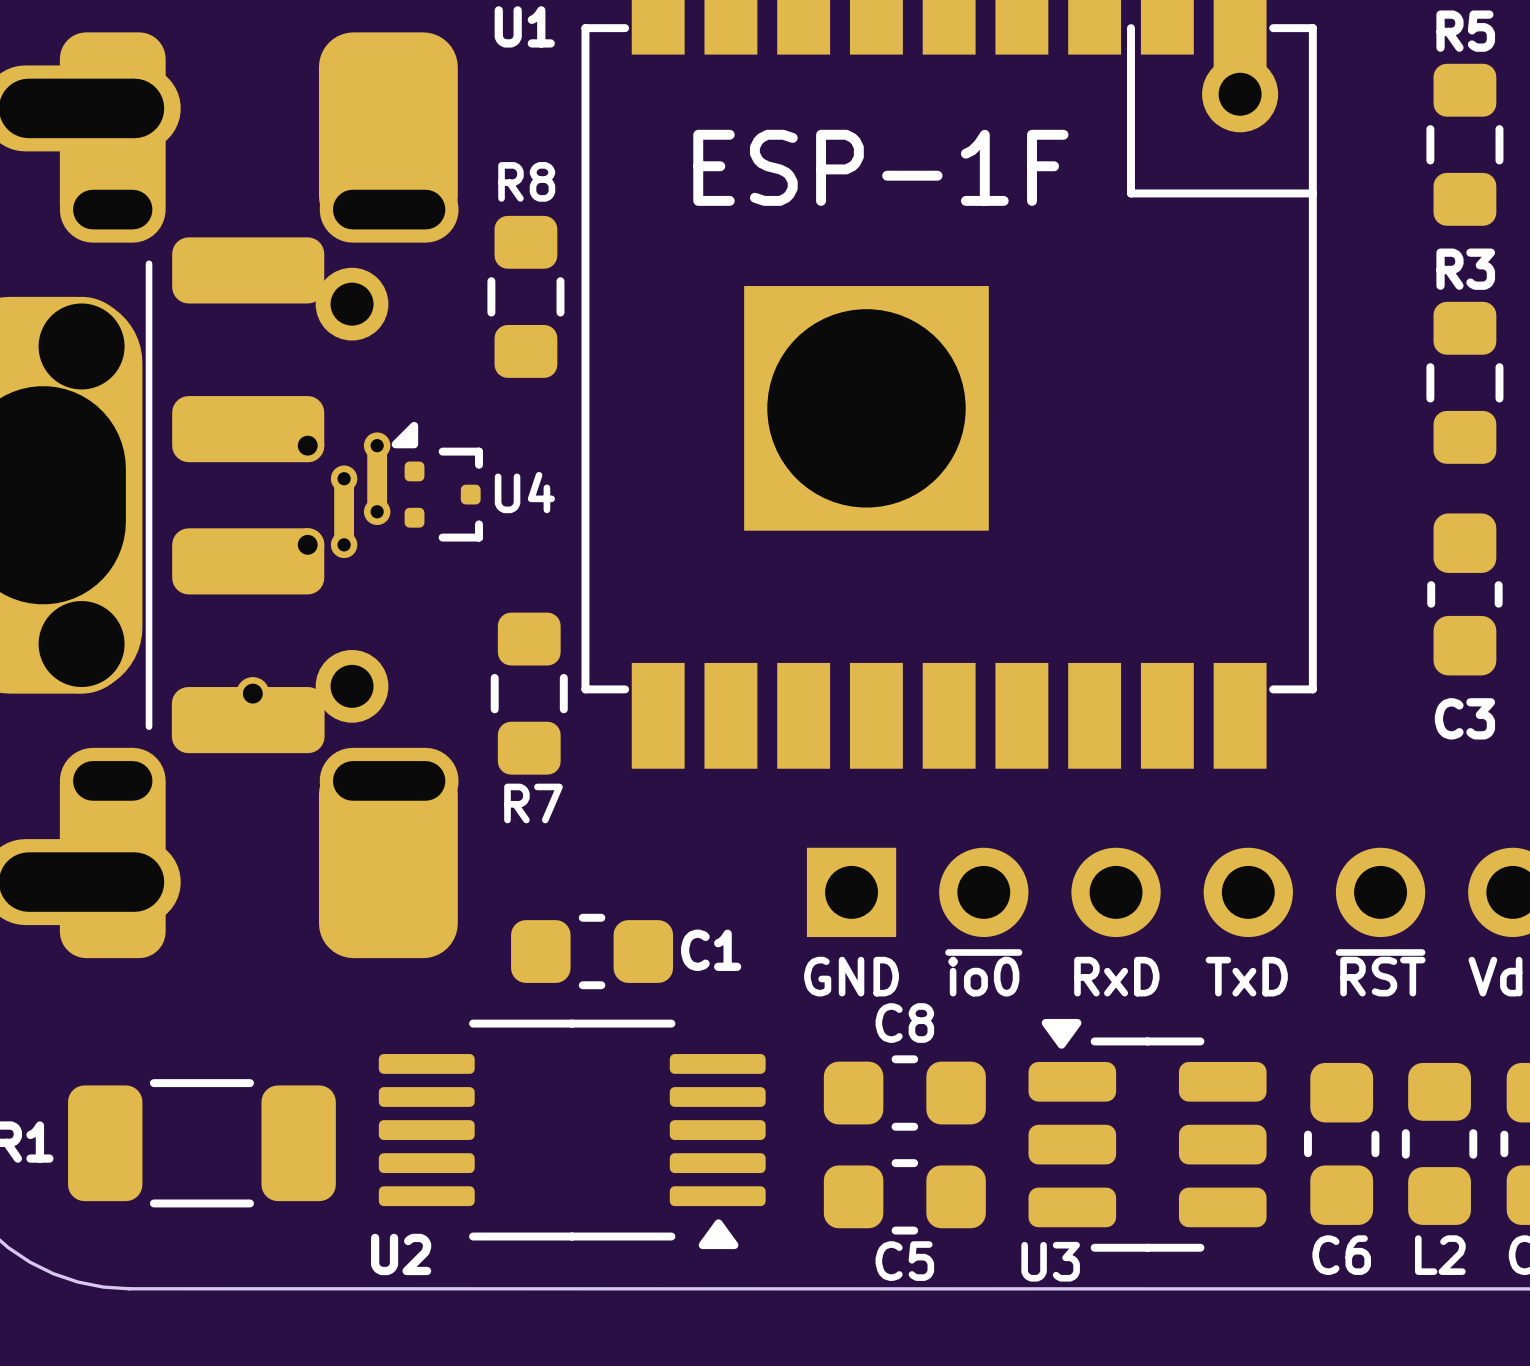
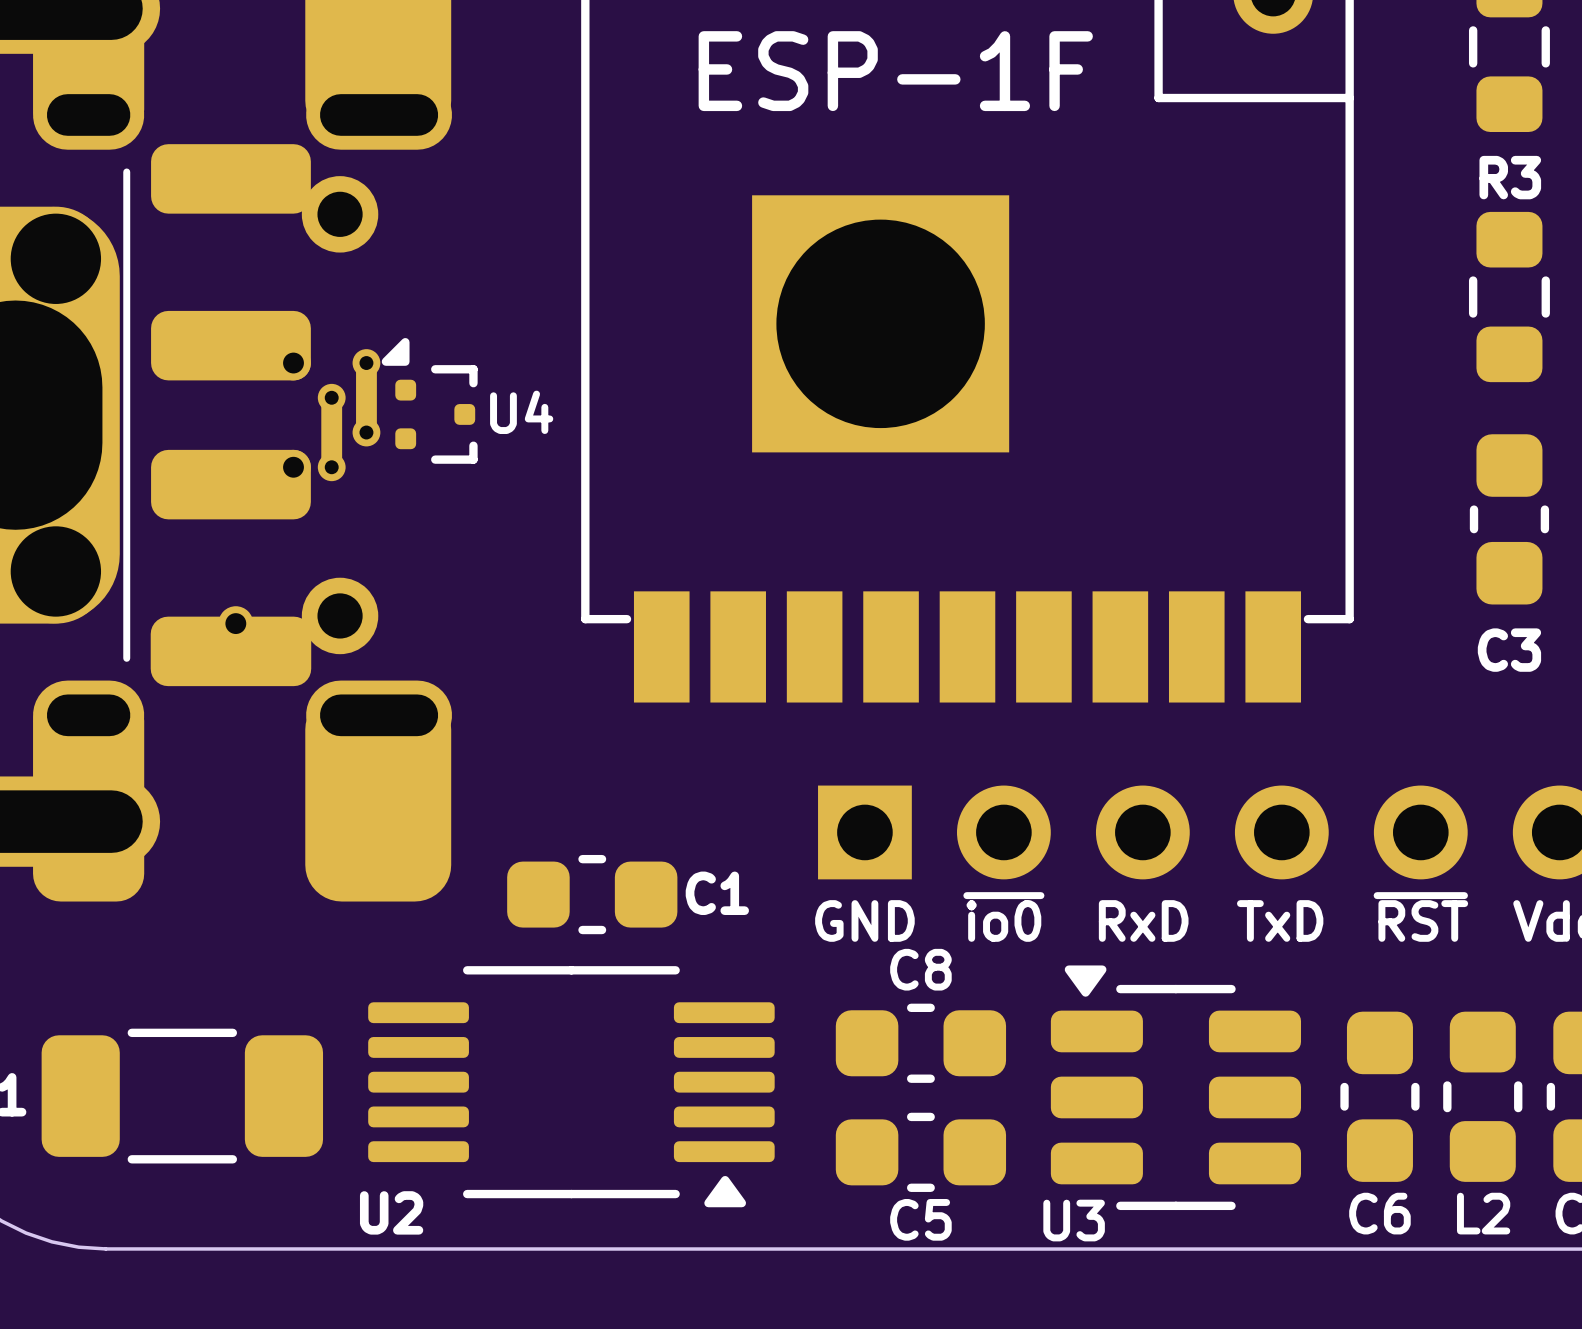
R8: (525, 296) -> none
R7: (529, 693) -> none

